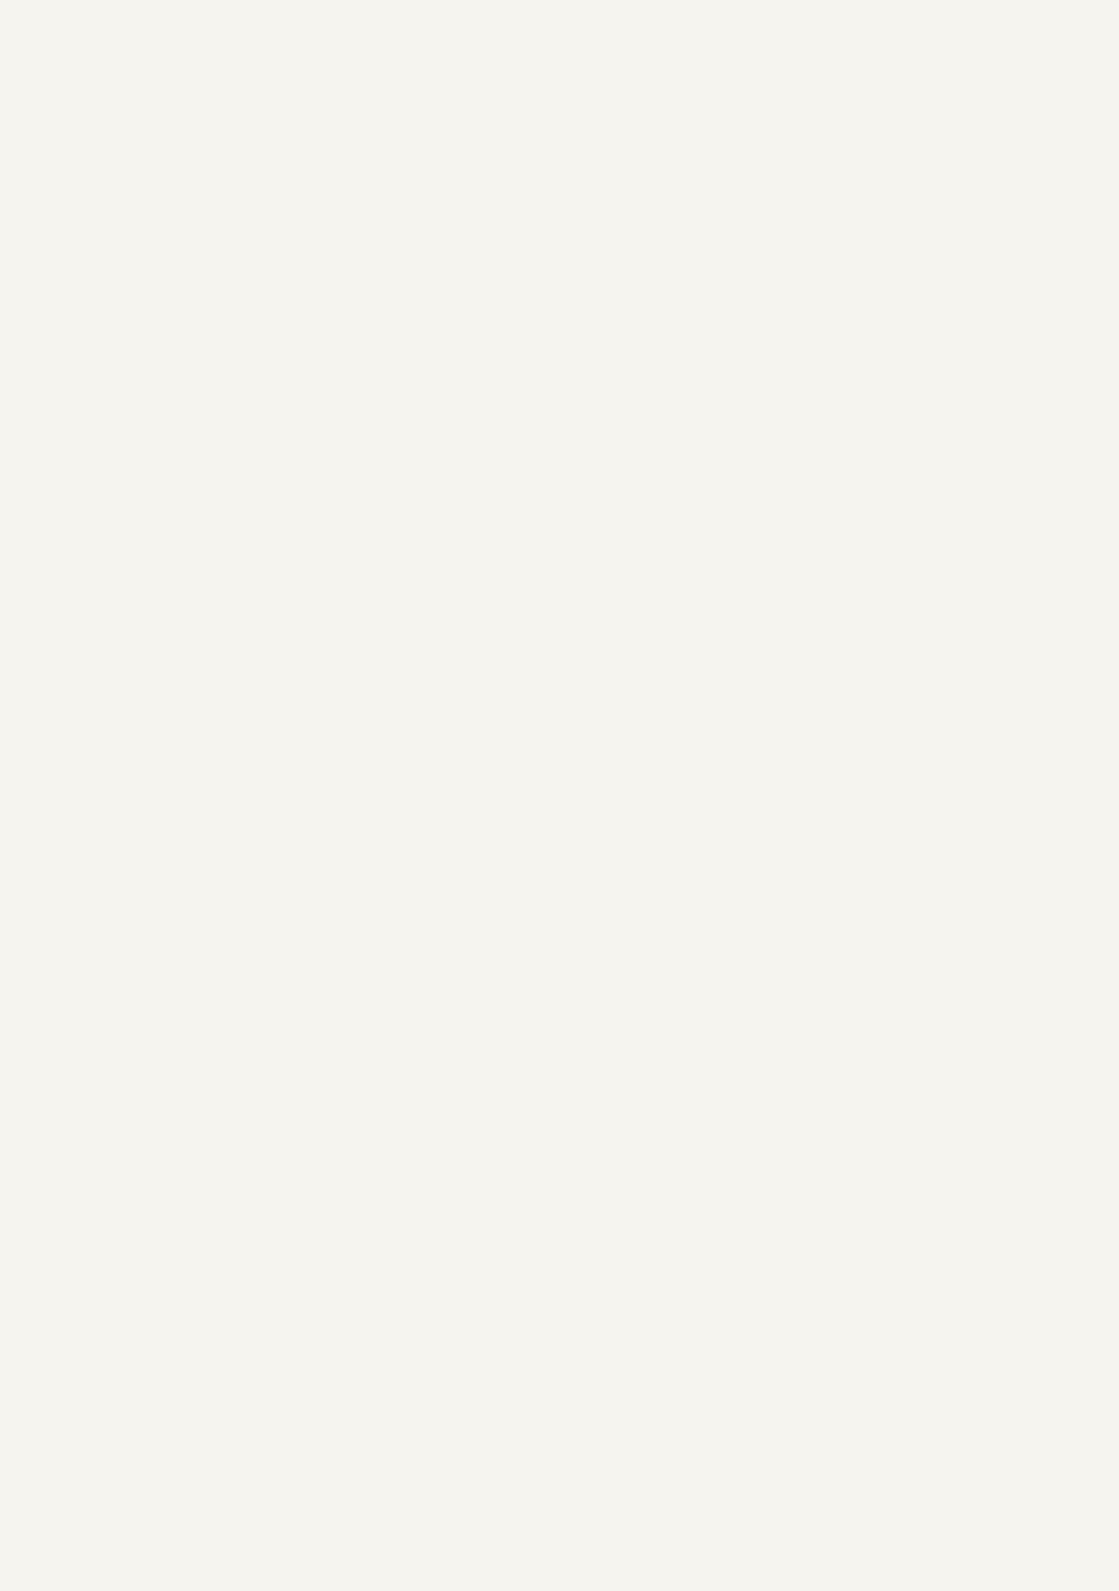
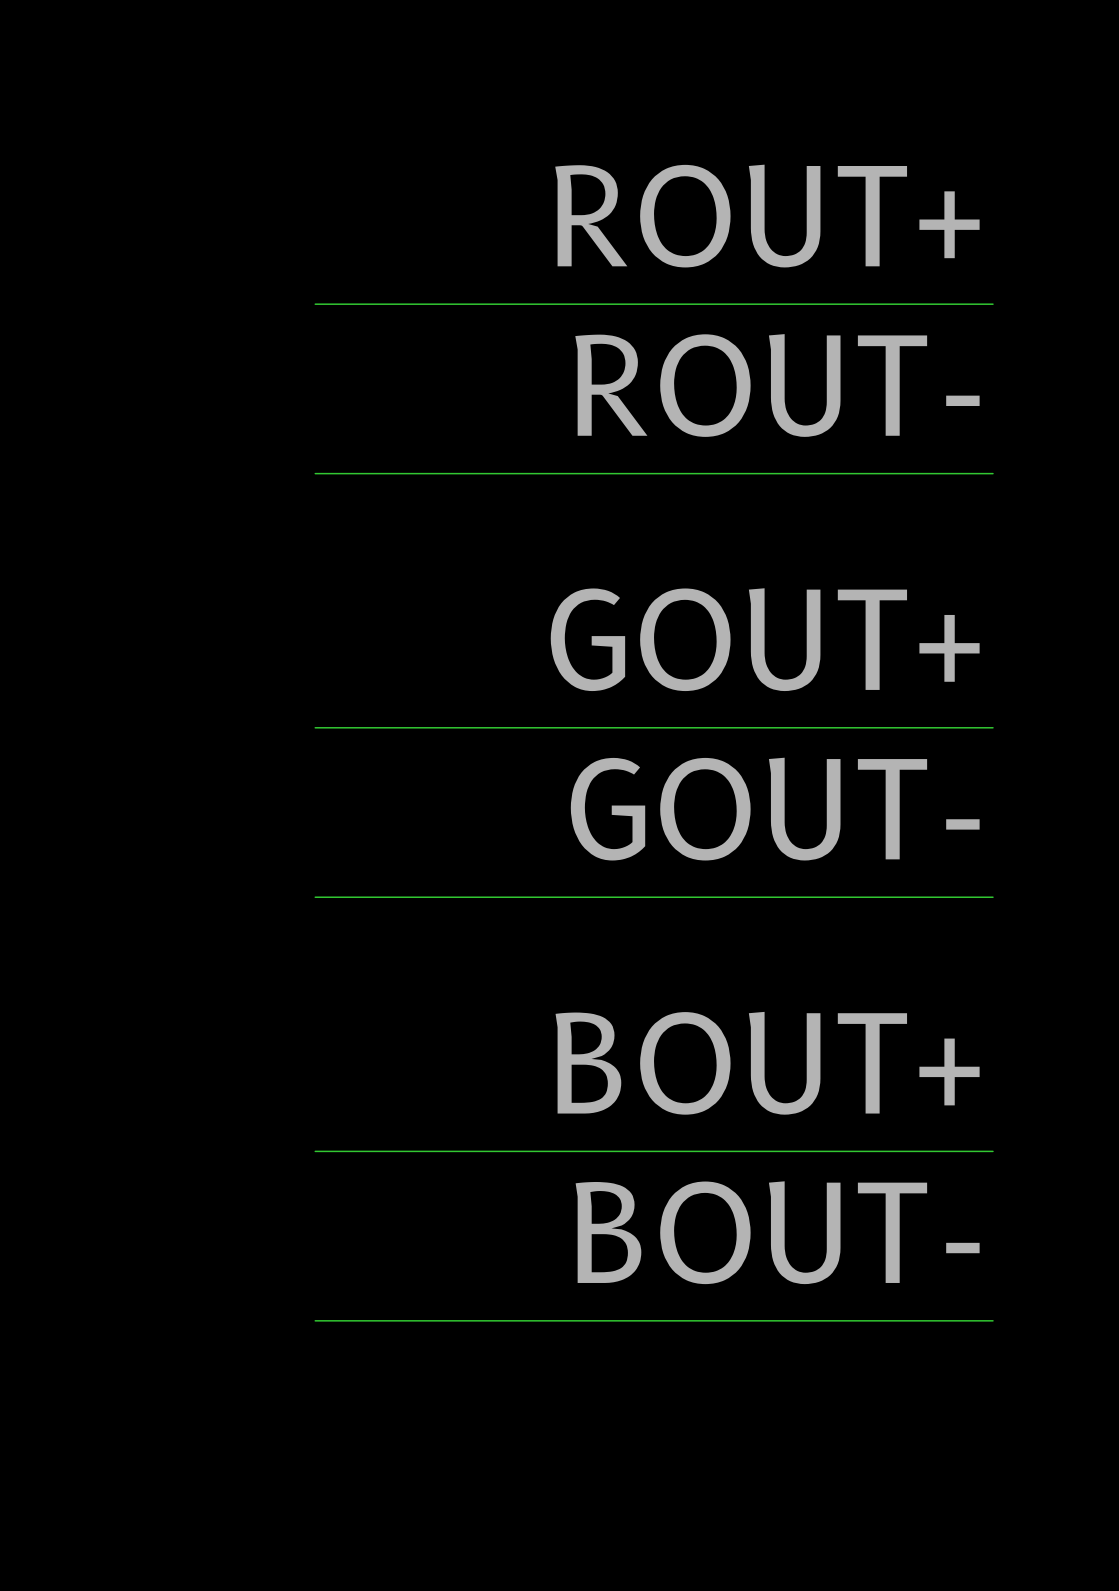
label: none -> ROUT+ (767, 216)
wire: none -> (315, 304) (993, 304)
label: none -> ROUT- (777, 385)
wire: none -> (315, 473) (993, 473)
label: none -> GOUT+ (765, 639)
wire: none -> (315, 727) (993, 727)
label: none -> GOUT- (775, 809)
wire: none -> (315, 897) (993, 897)
label: none -> BOUT+ (767, 1063)
wire: none -> (315, 1151) (993, 1151)
label: none -> BOUT- (777, 1232)
wire: none -> (315, 1320) (993, 1320)

